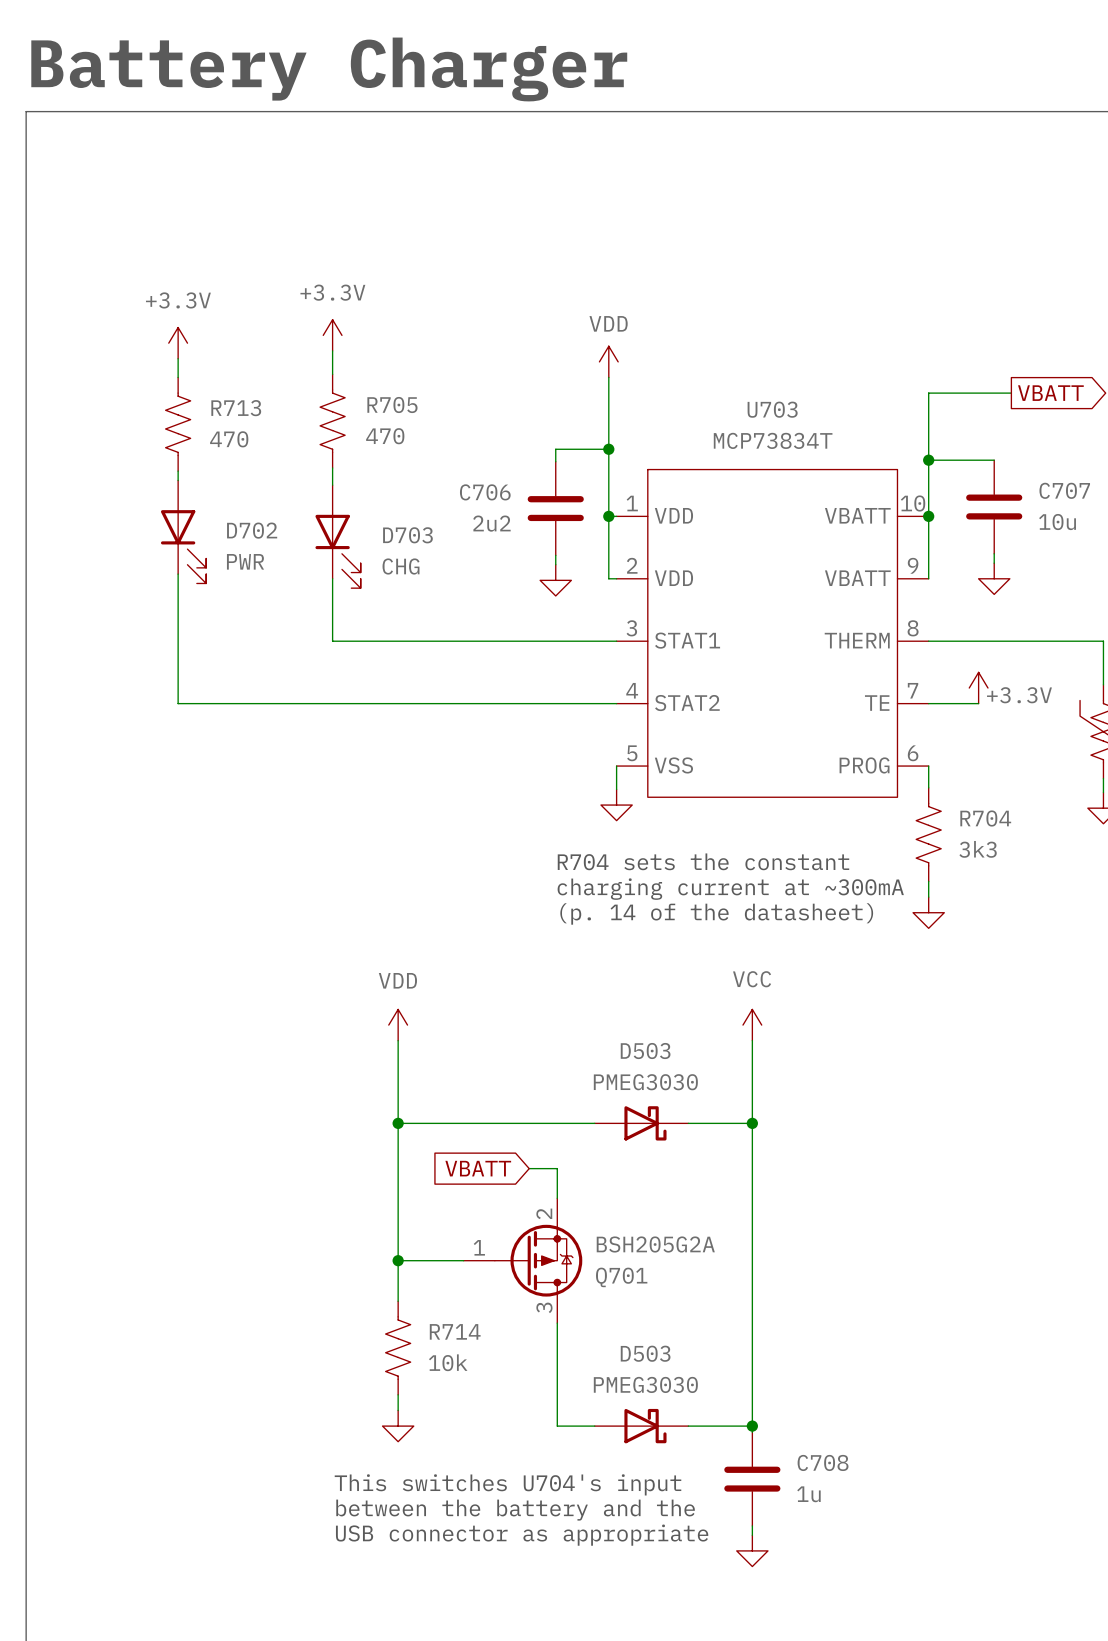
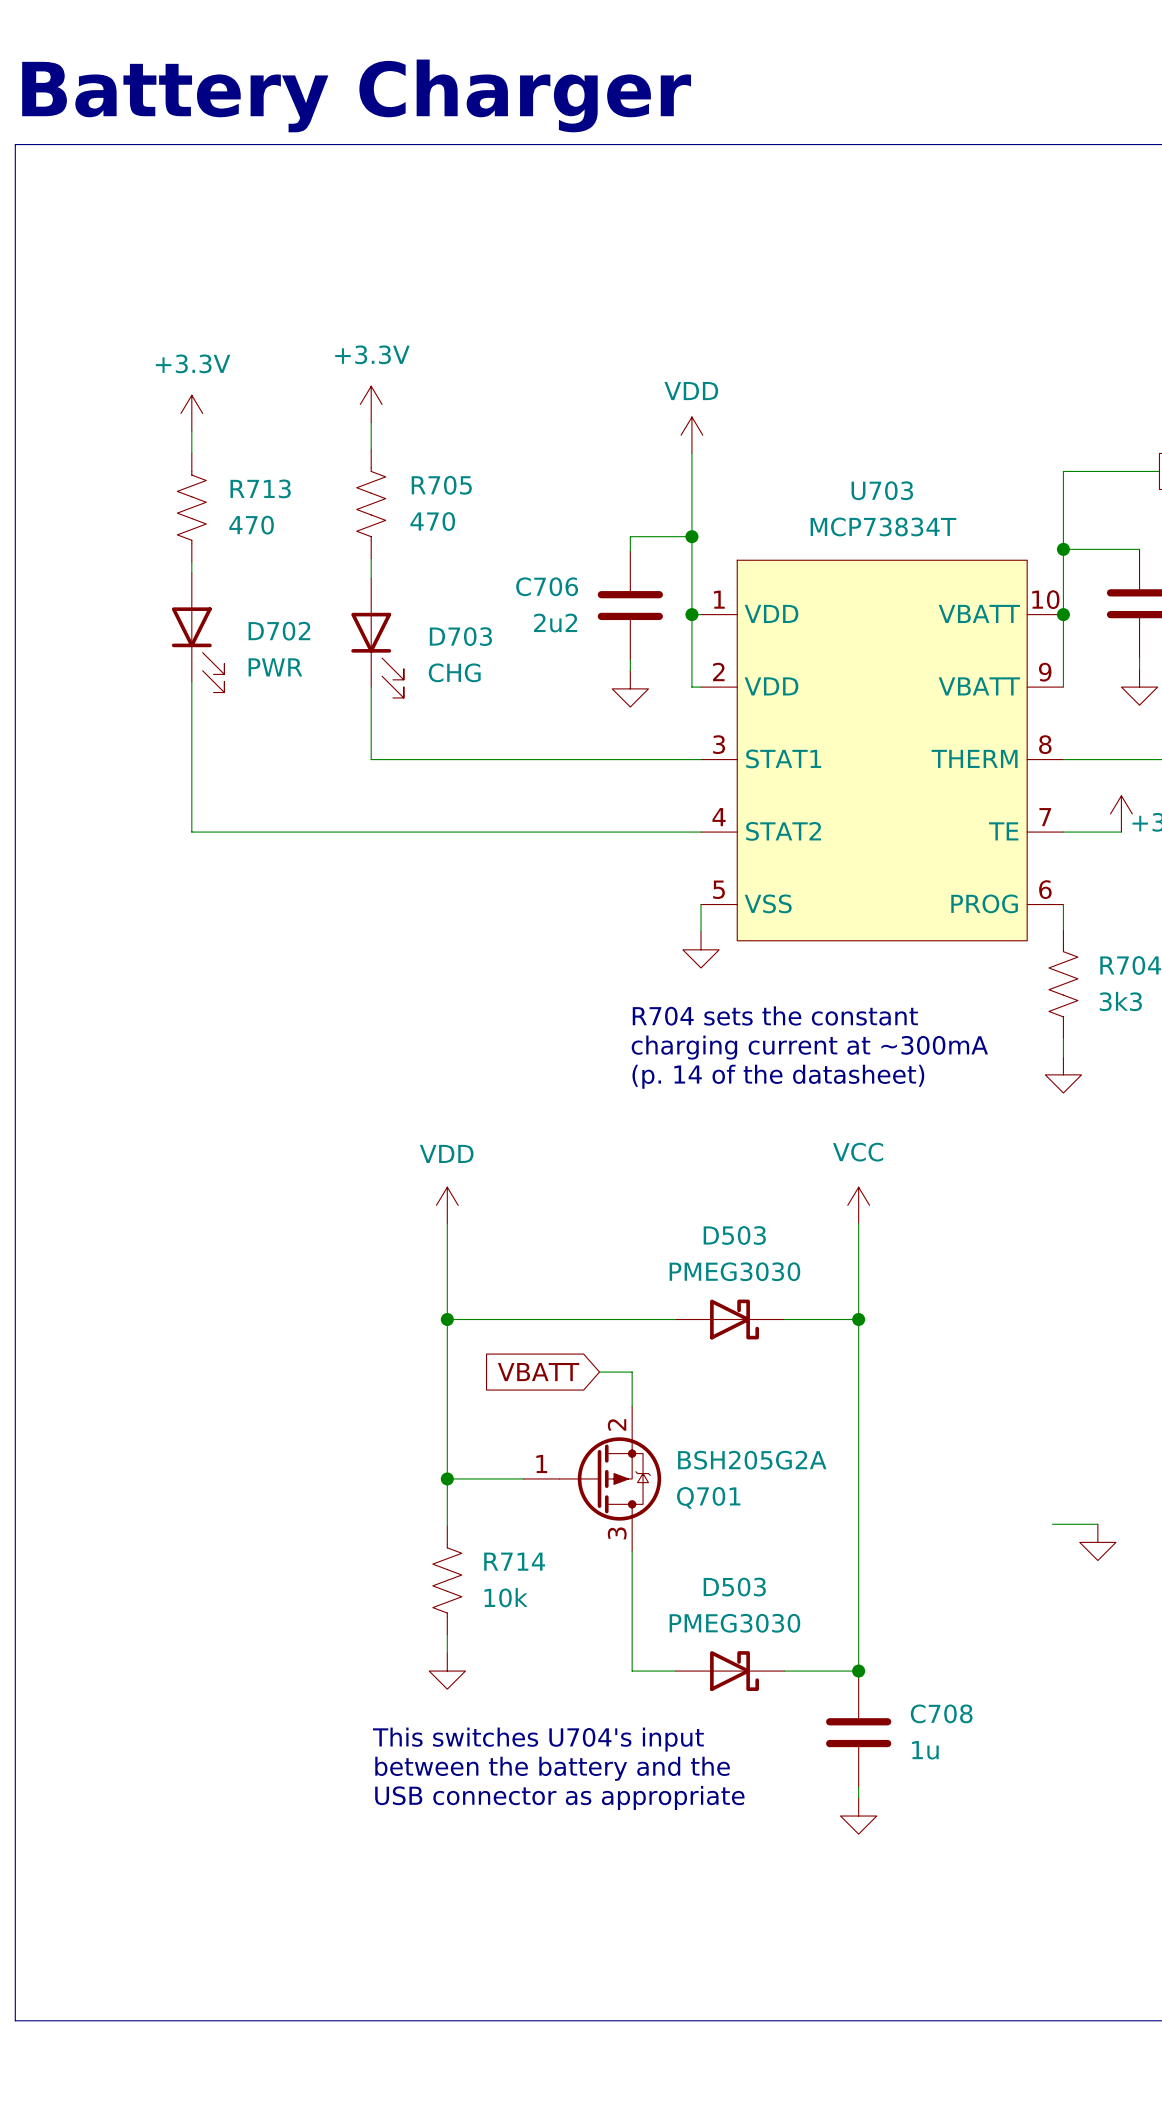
wire: none -> (1052, 1524) (1097, 1524)
power symbol: none -> (1097, 1542)

